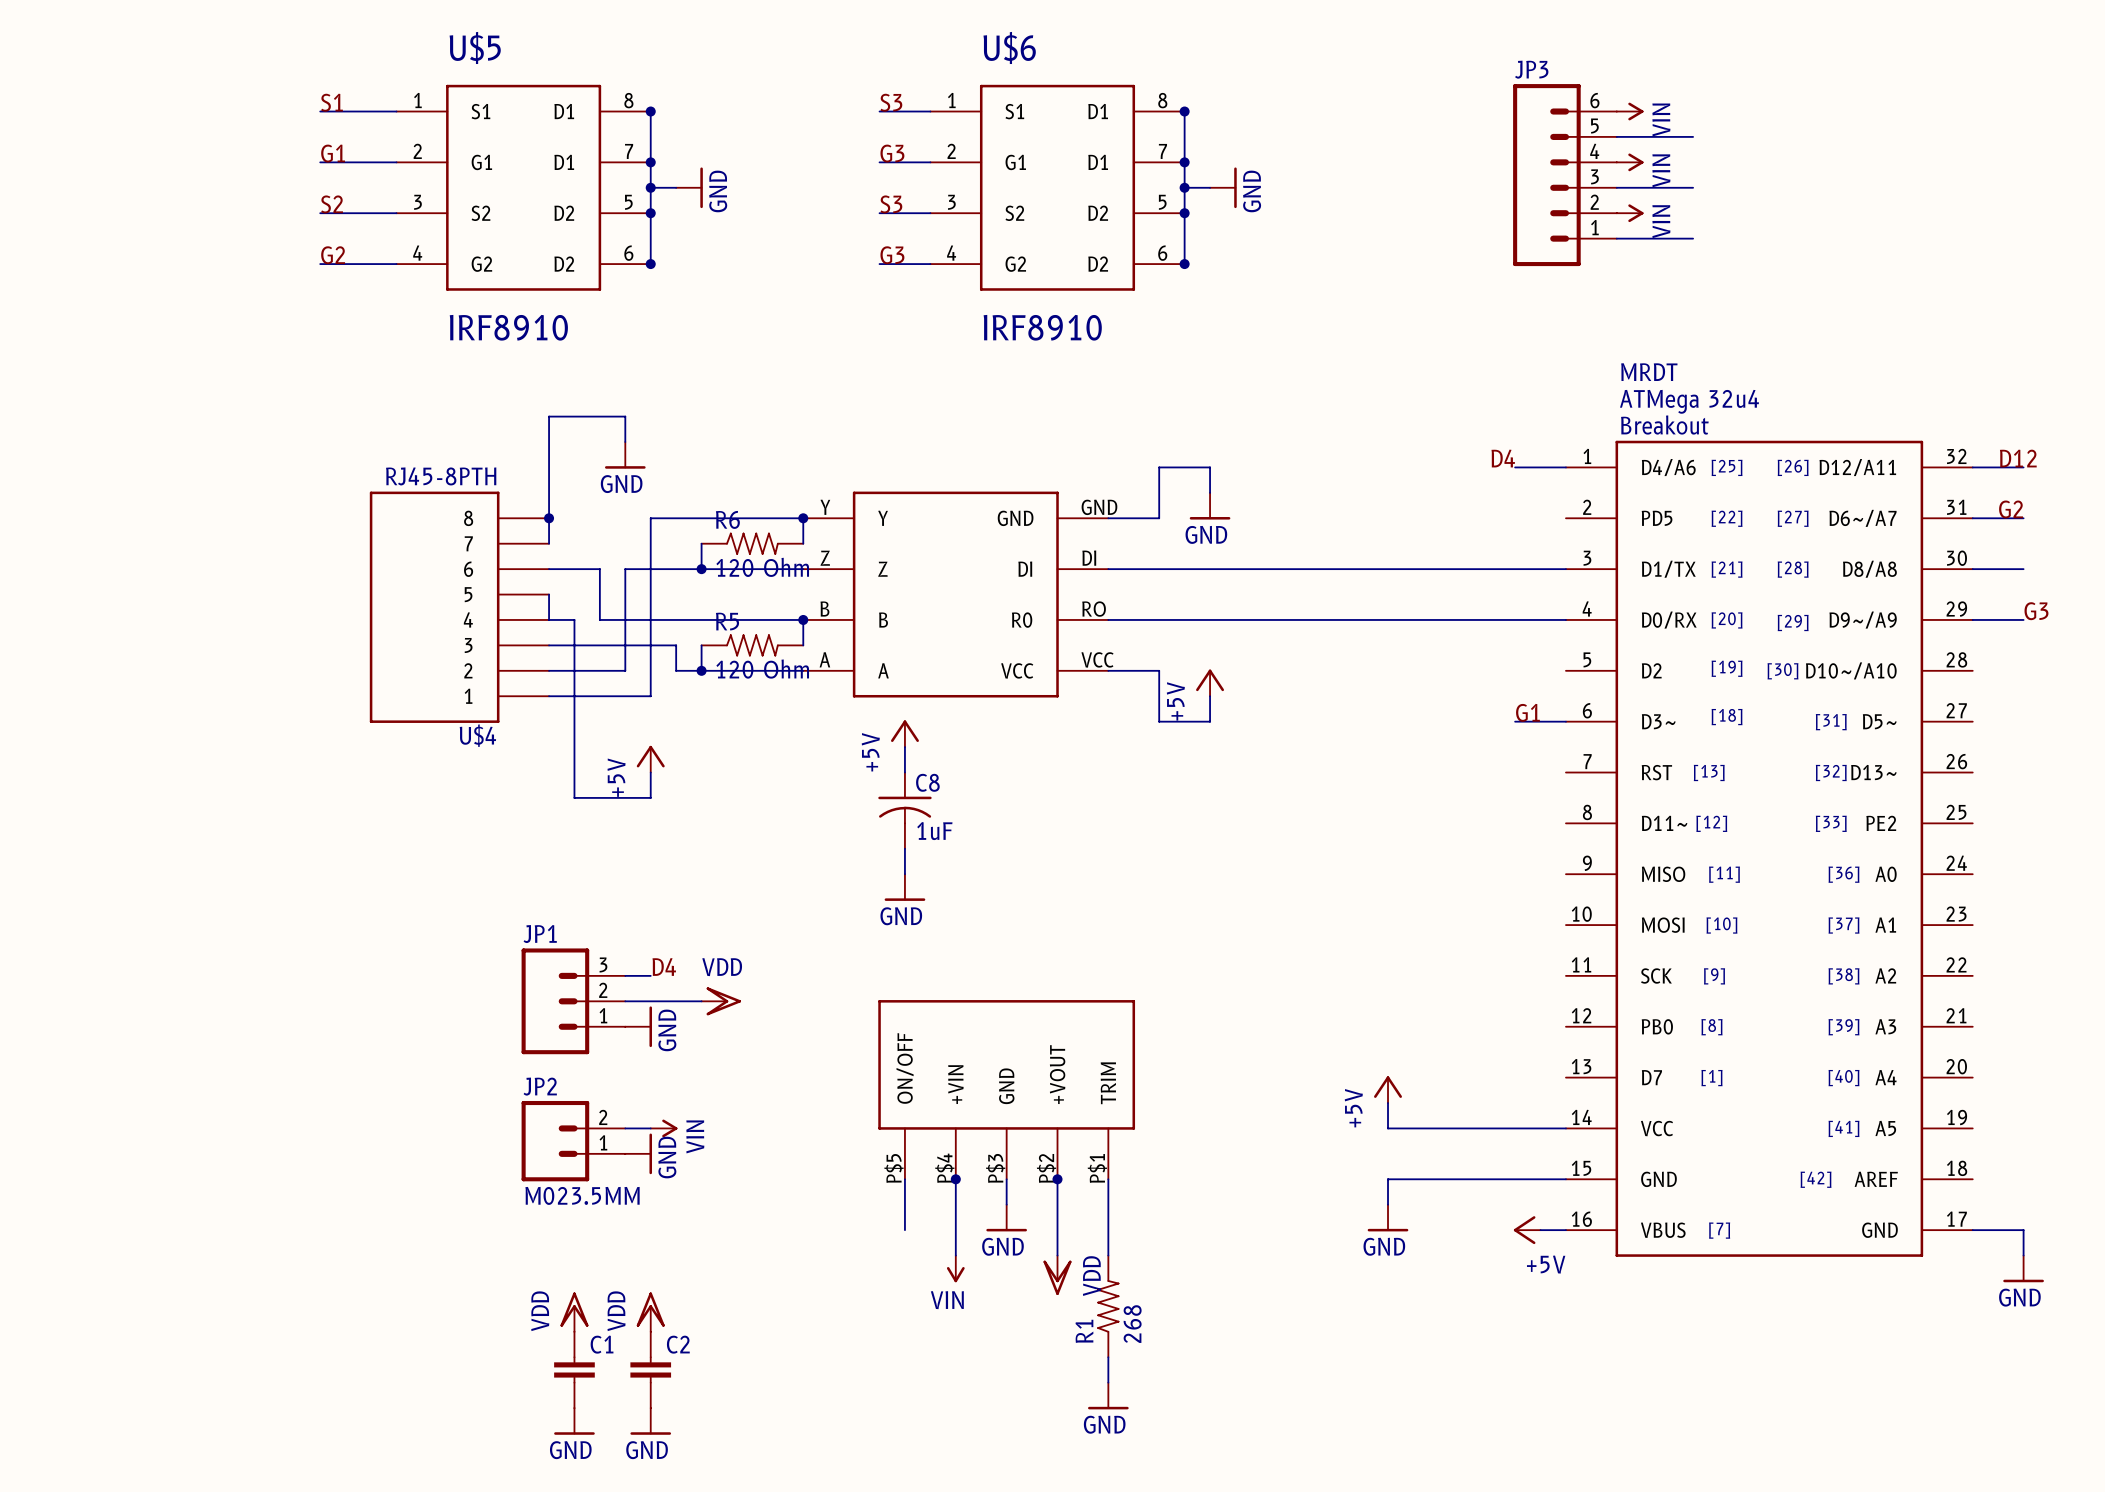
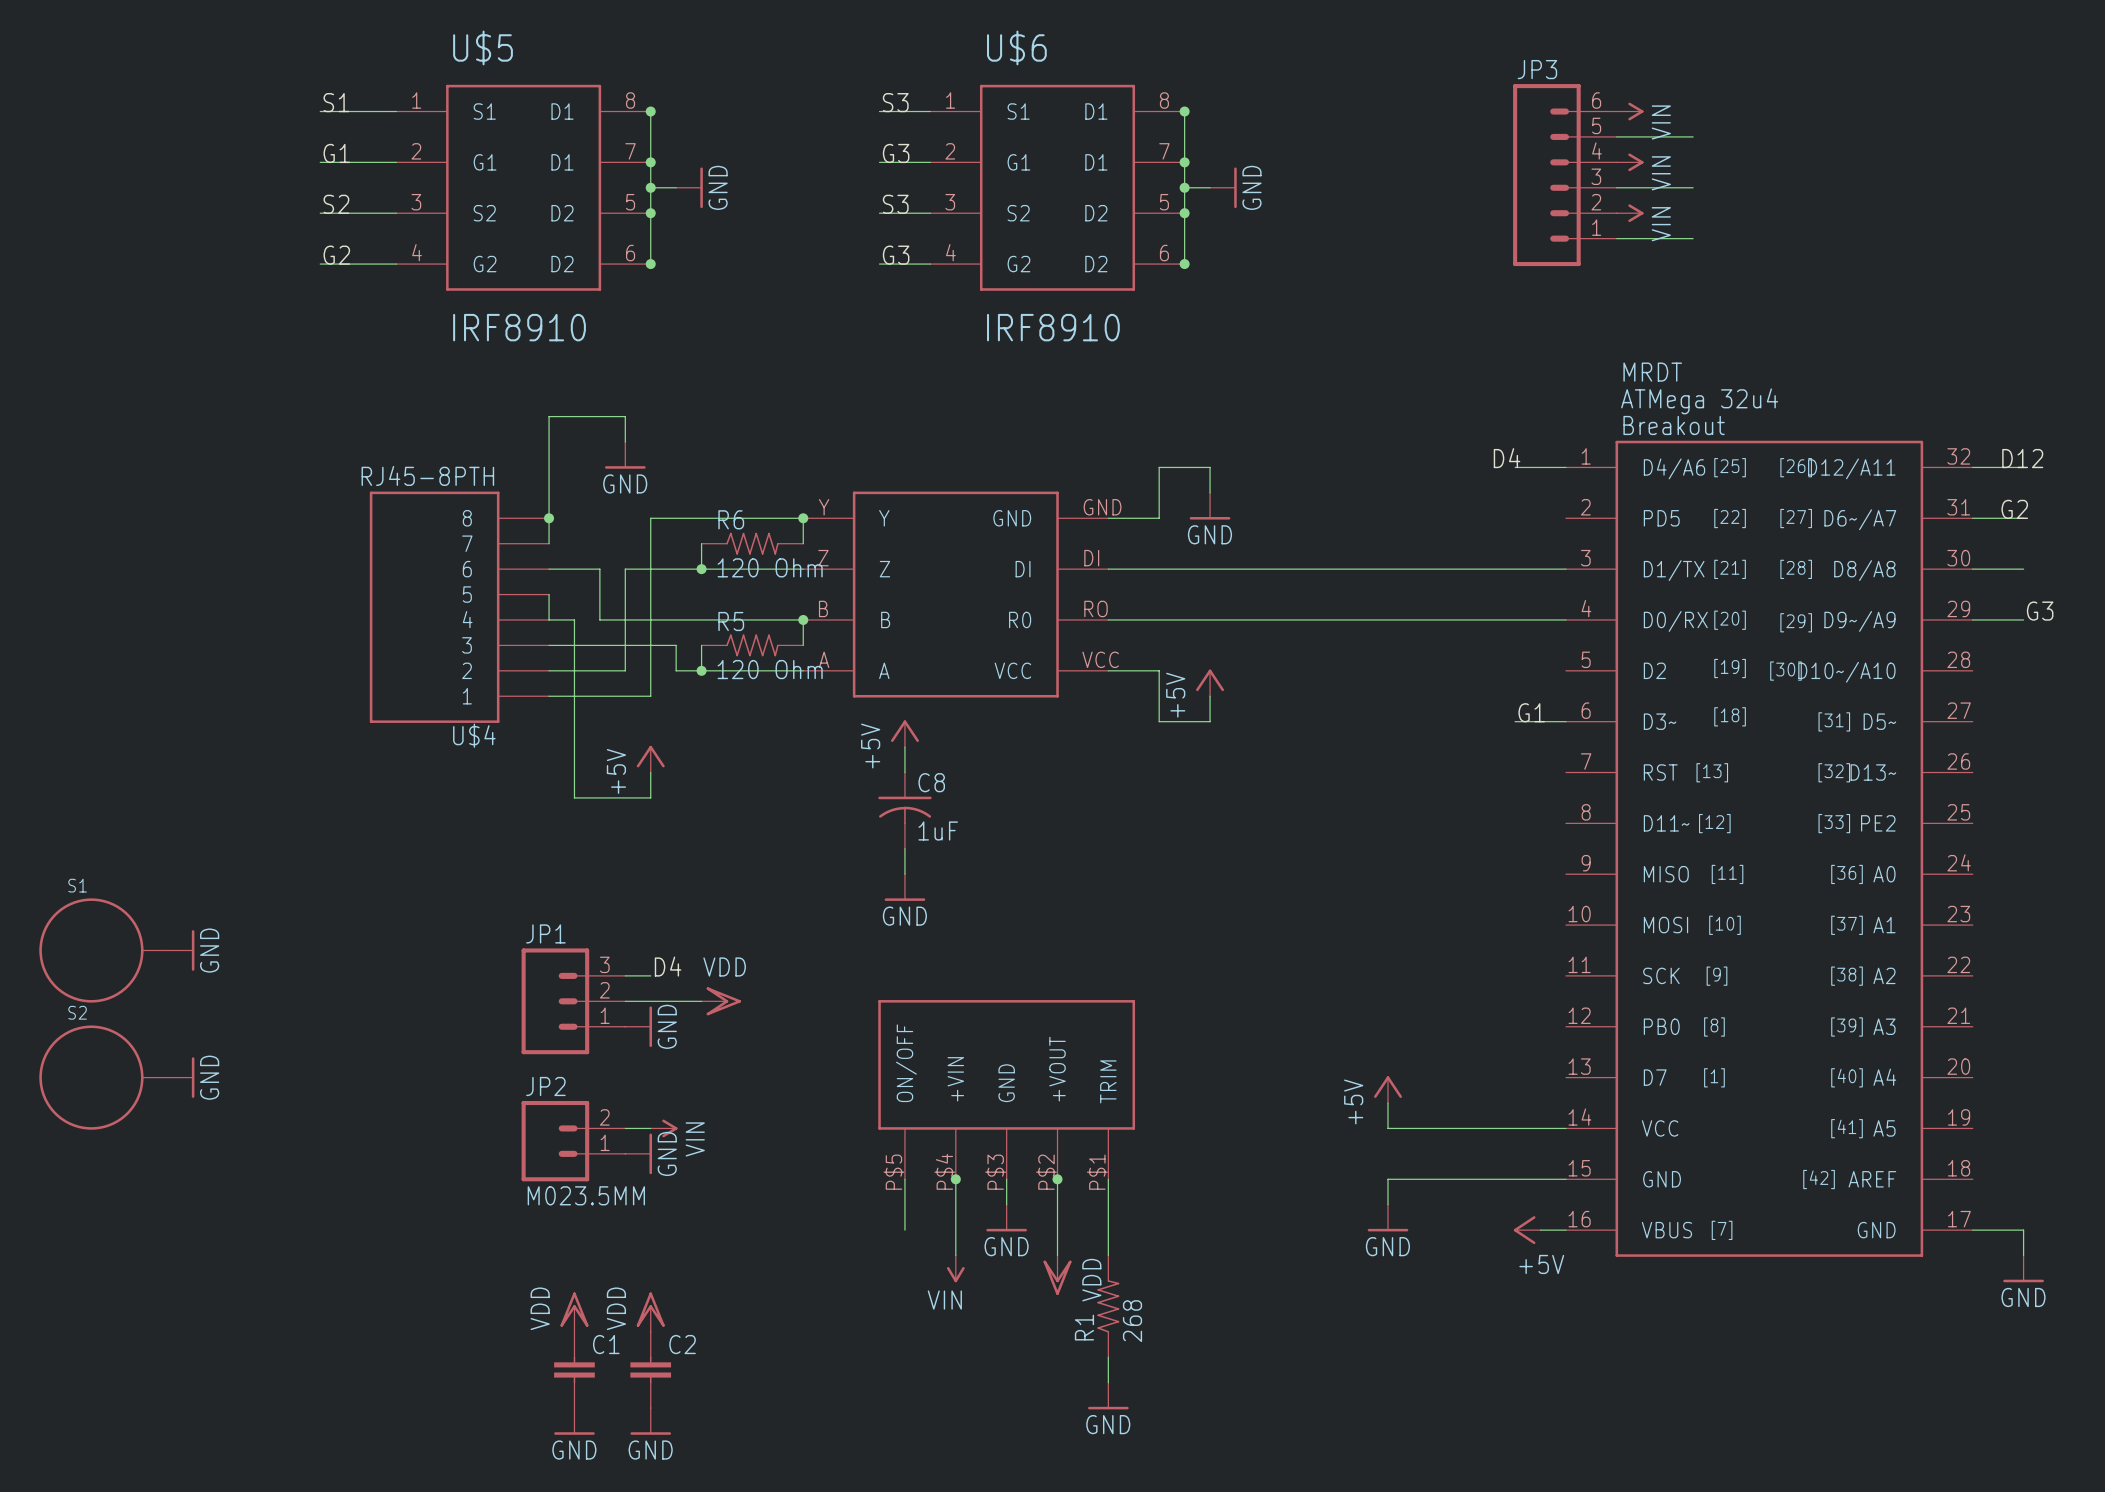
S1: none -> (103, 950)
power symbol: none -> GND (181, 950)
S2: none -> (103, 1077)
power symbol: none -> GND (181, 1077)

